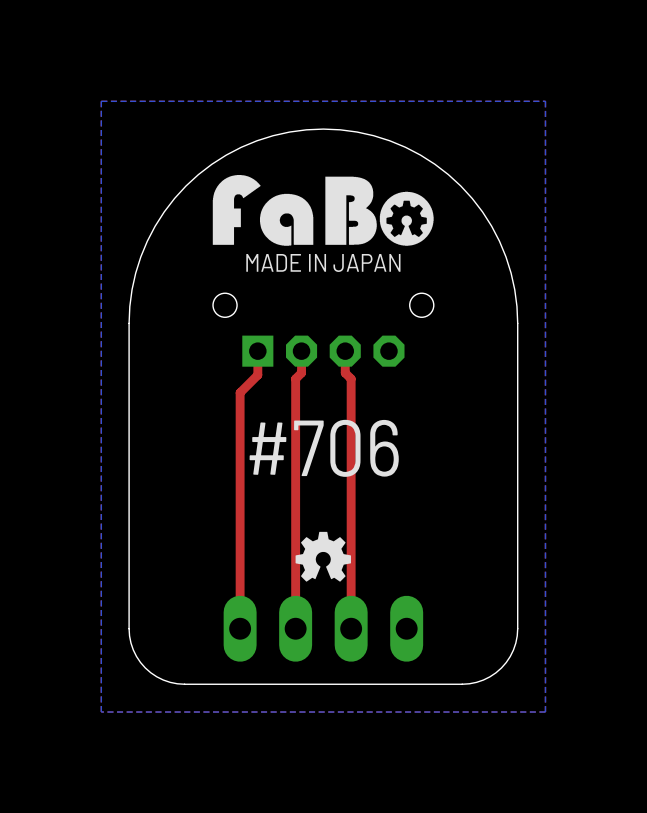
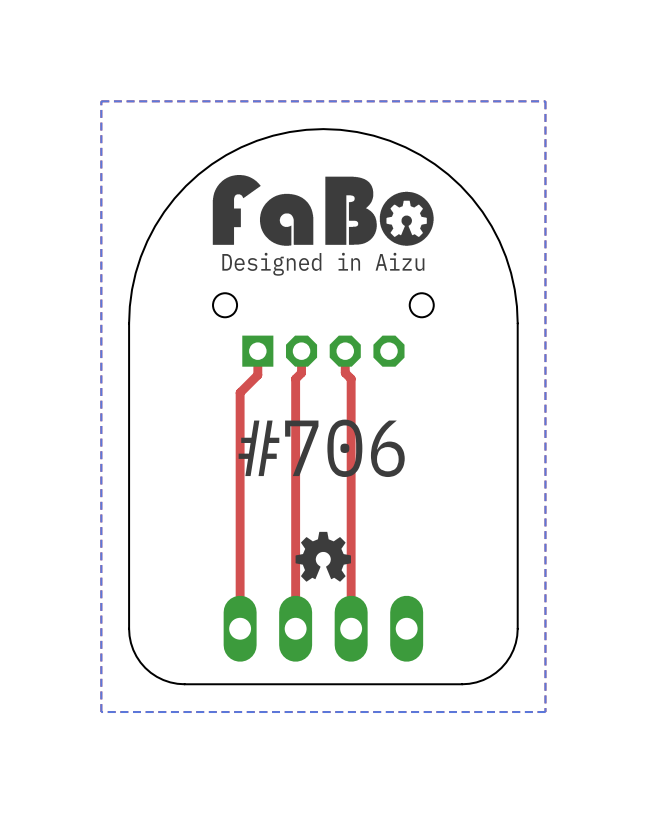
text: MADE IN JAPAN (323, 262) -> Designed in Aizu (323, 264)

